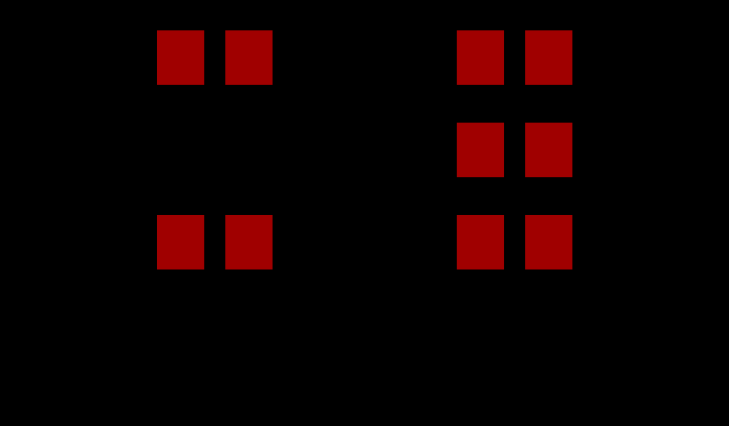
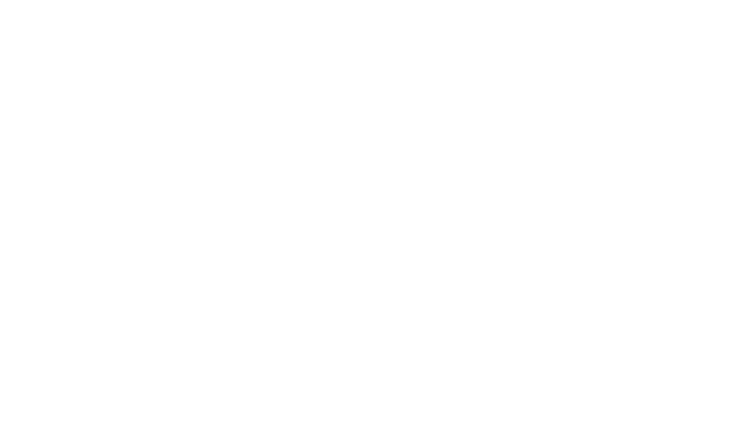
part: (214, 57) -> none
part: (514, 57) -> none
part: (514, 149) -> none
part: (214, 242) -> none
part: (514, 242) -> none

